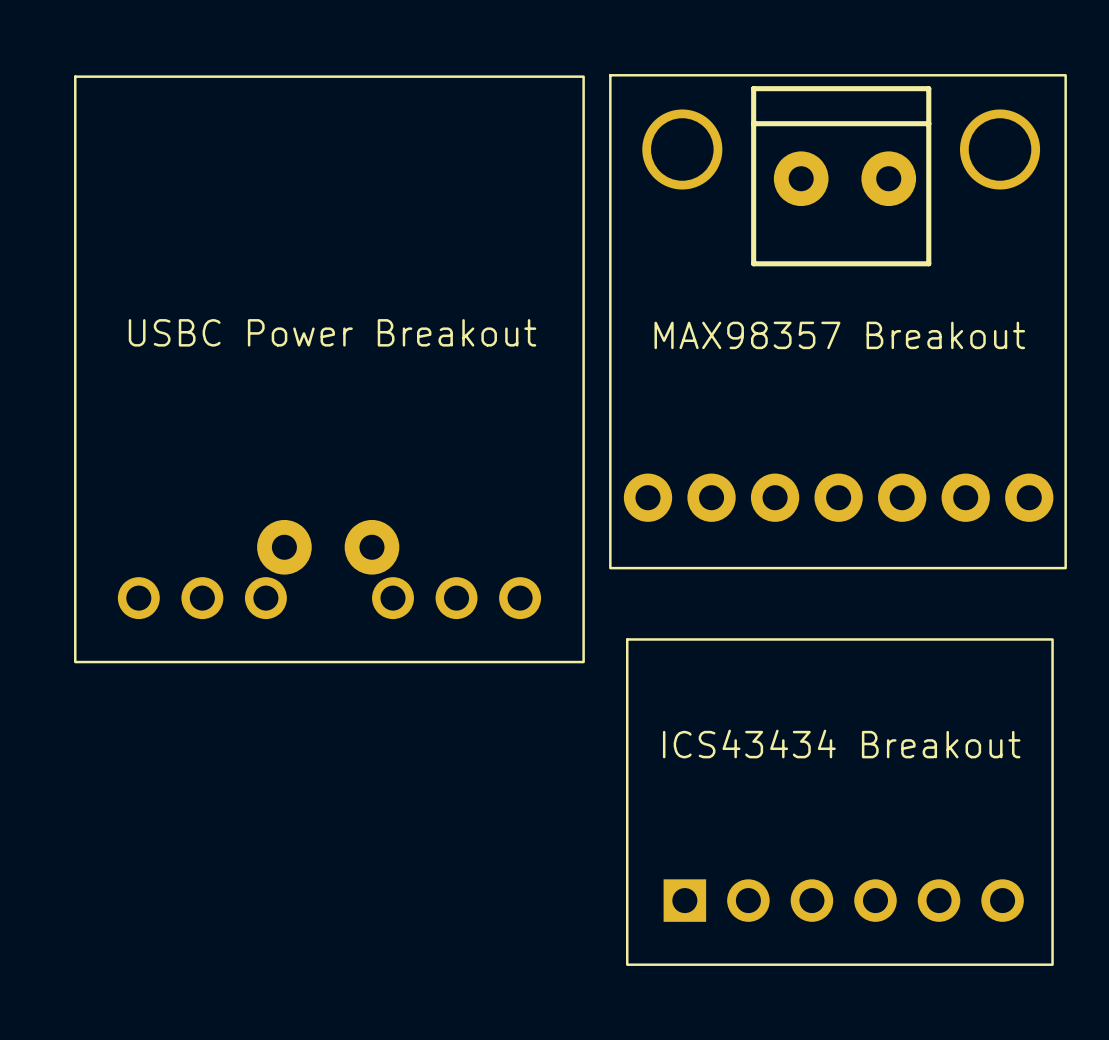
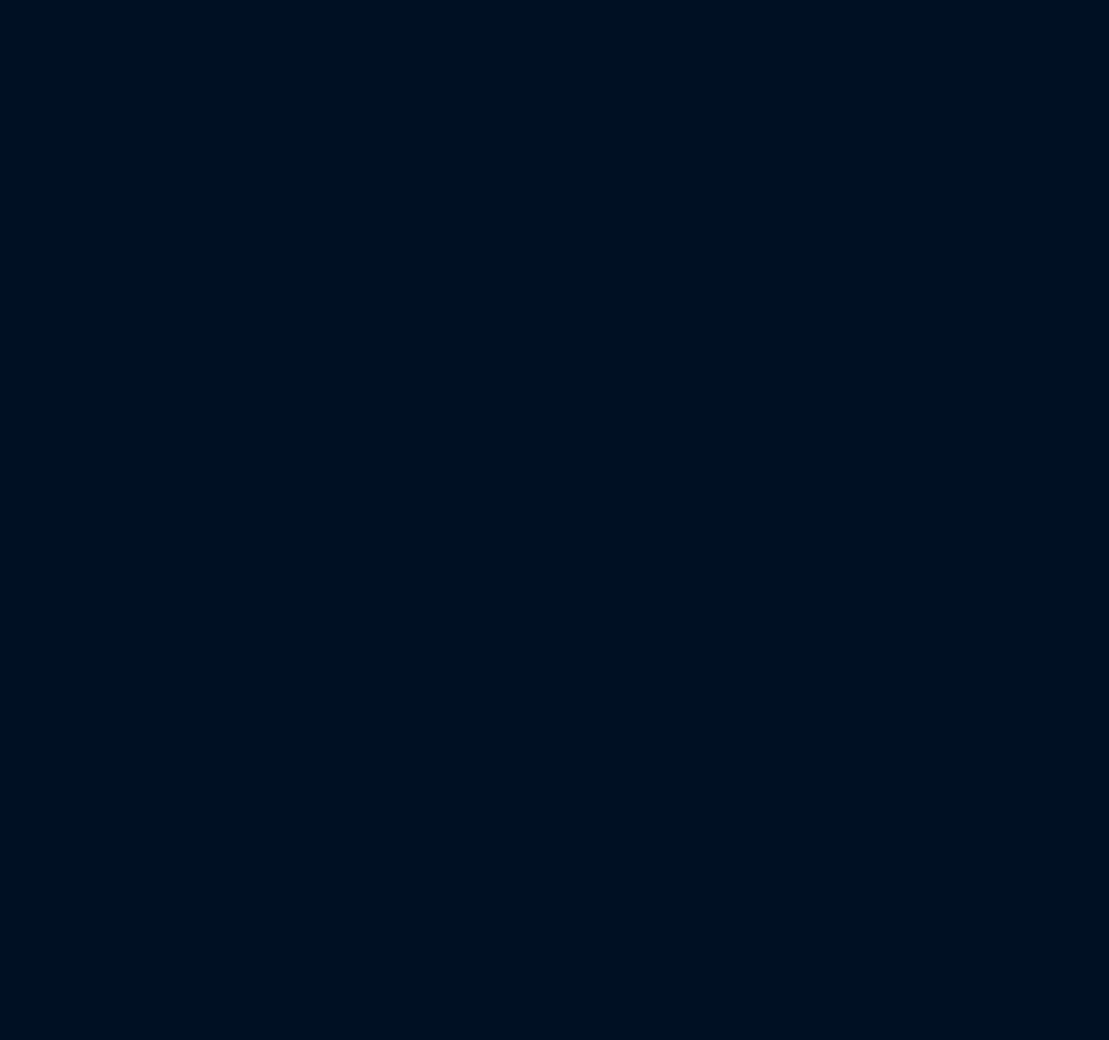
part: (838, 321) -> none
part: (329, 369) -> none
part: (839, 802) -> none

